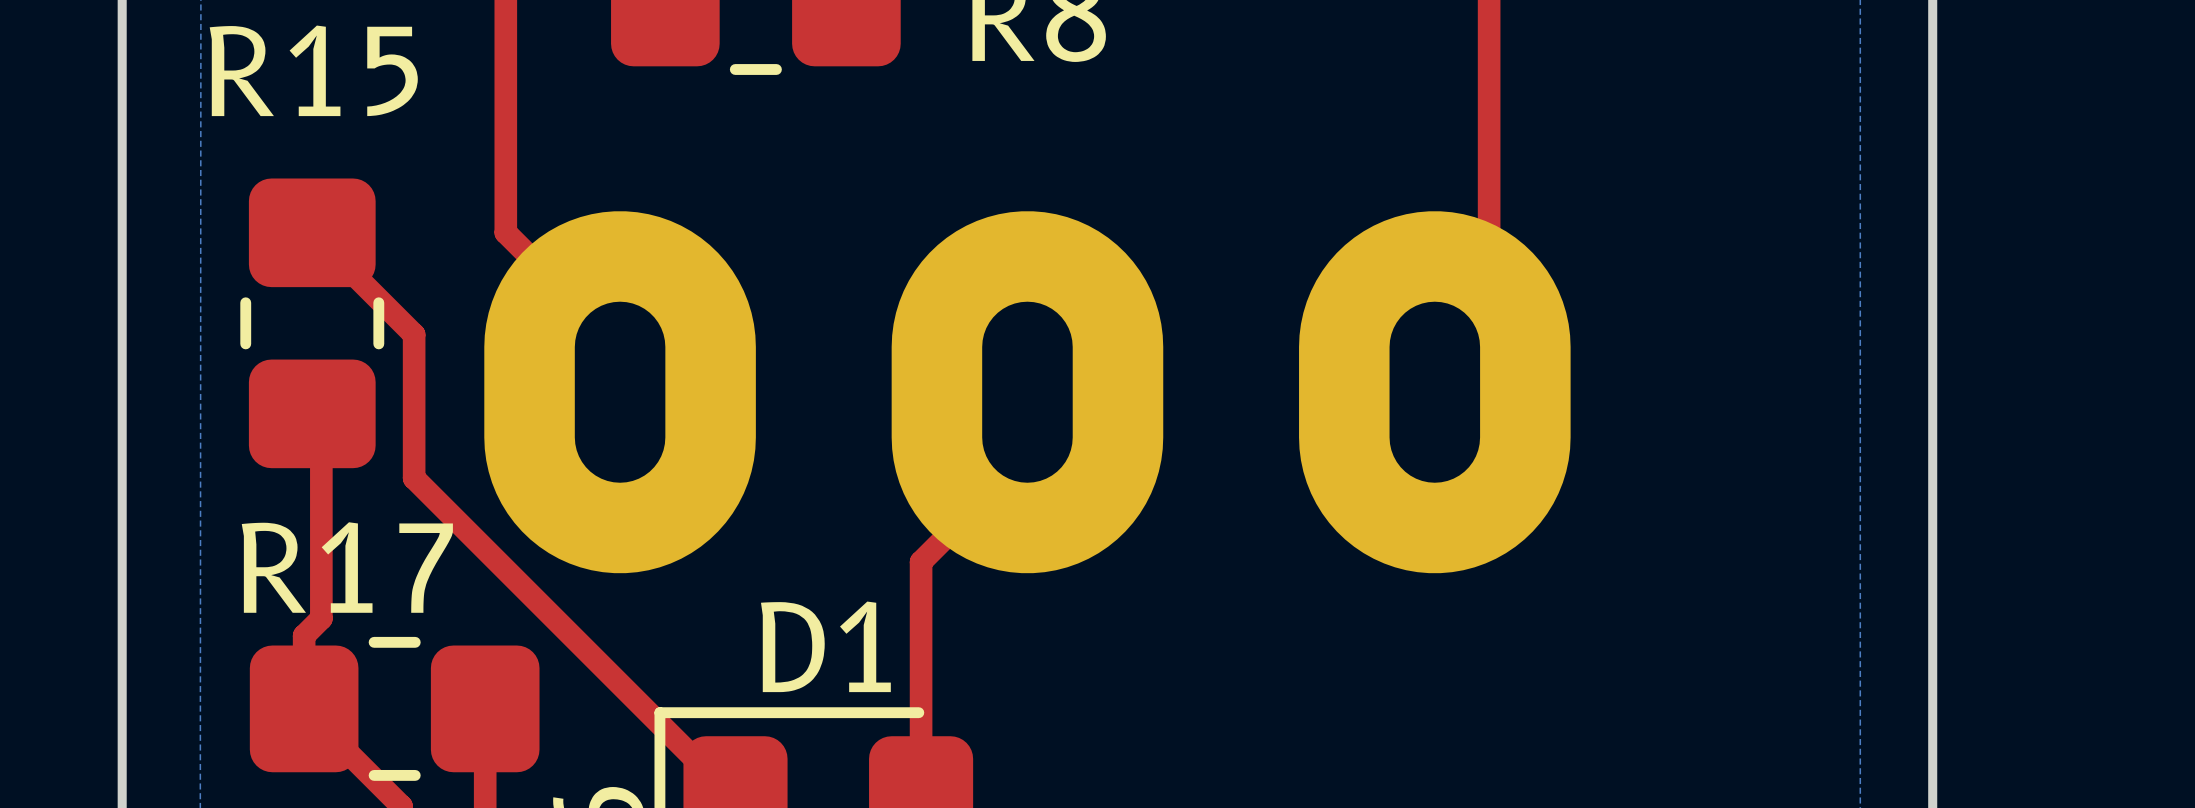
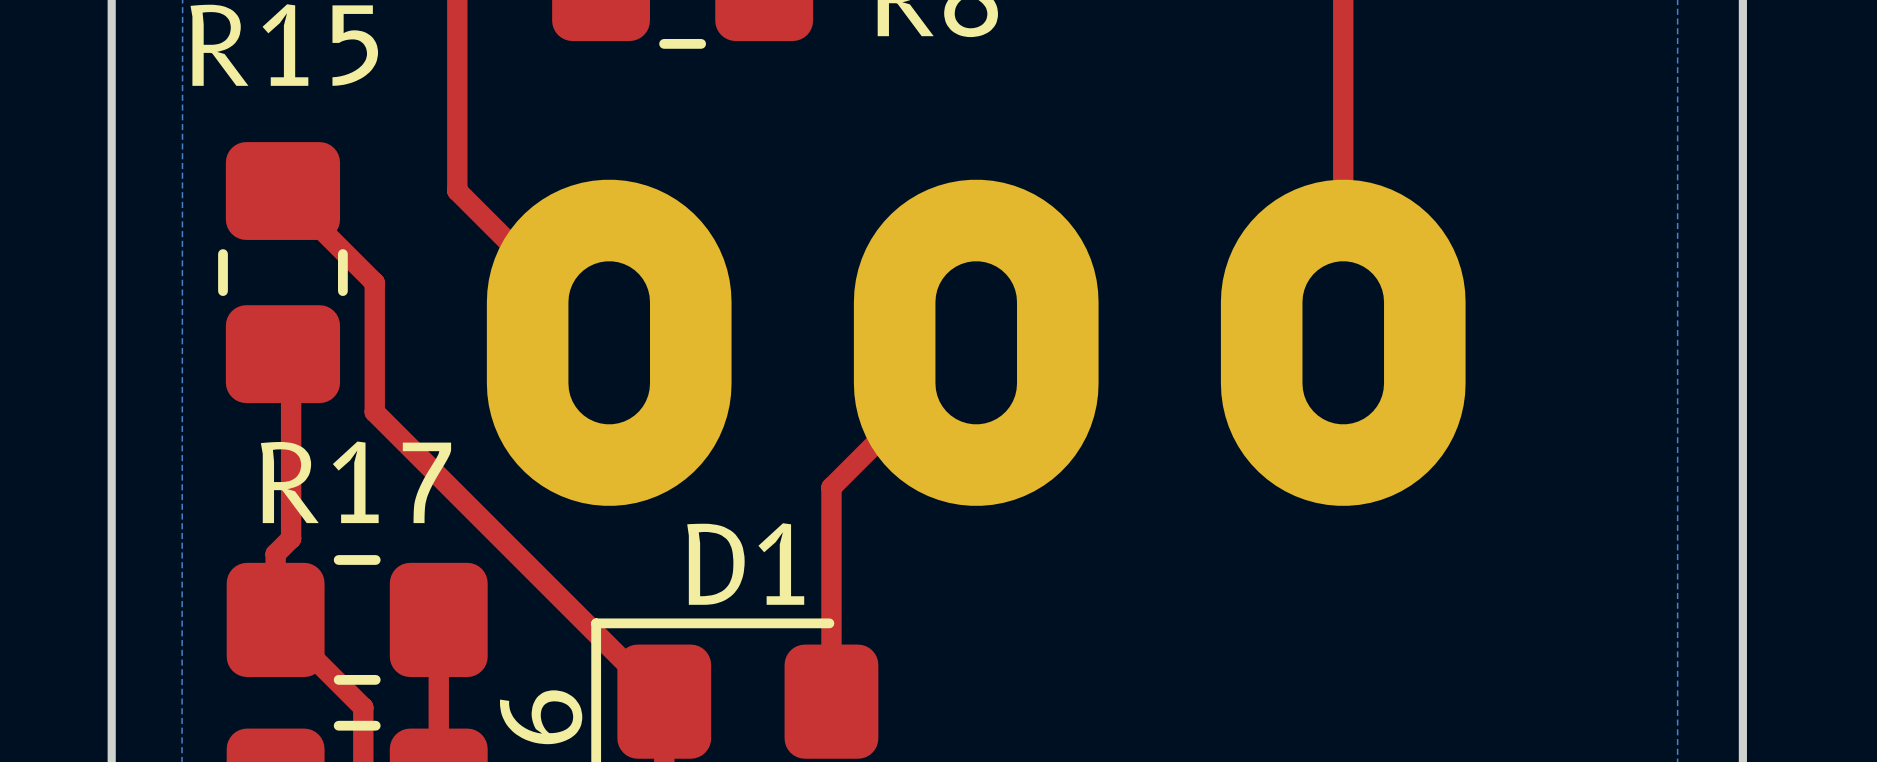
part position: (1027, 392) -> (976, 342)
R17 name position: R17 (347, 567) -> R17 (355, 482)

